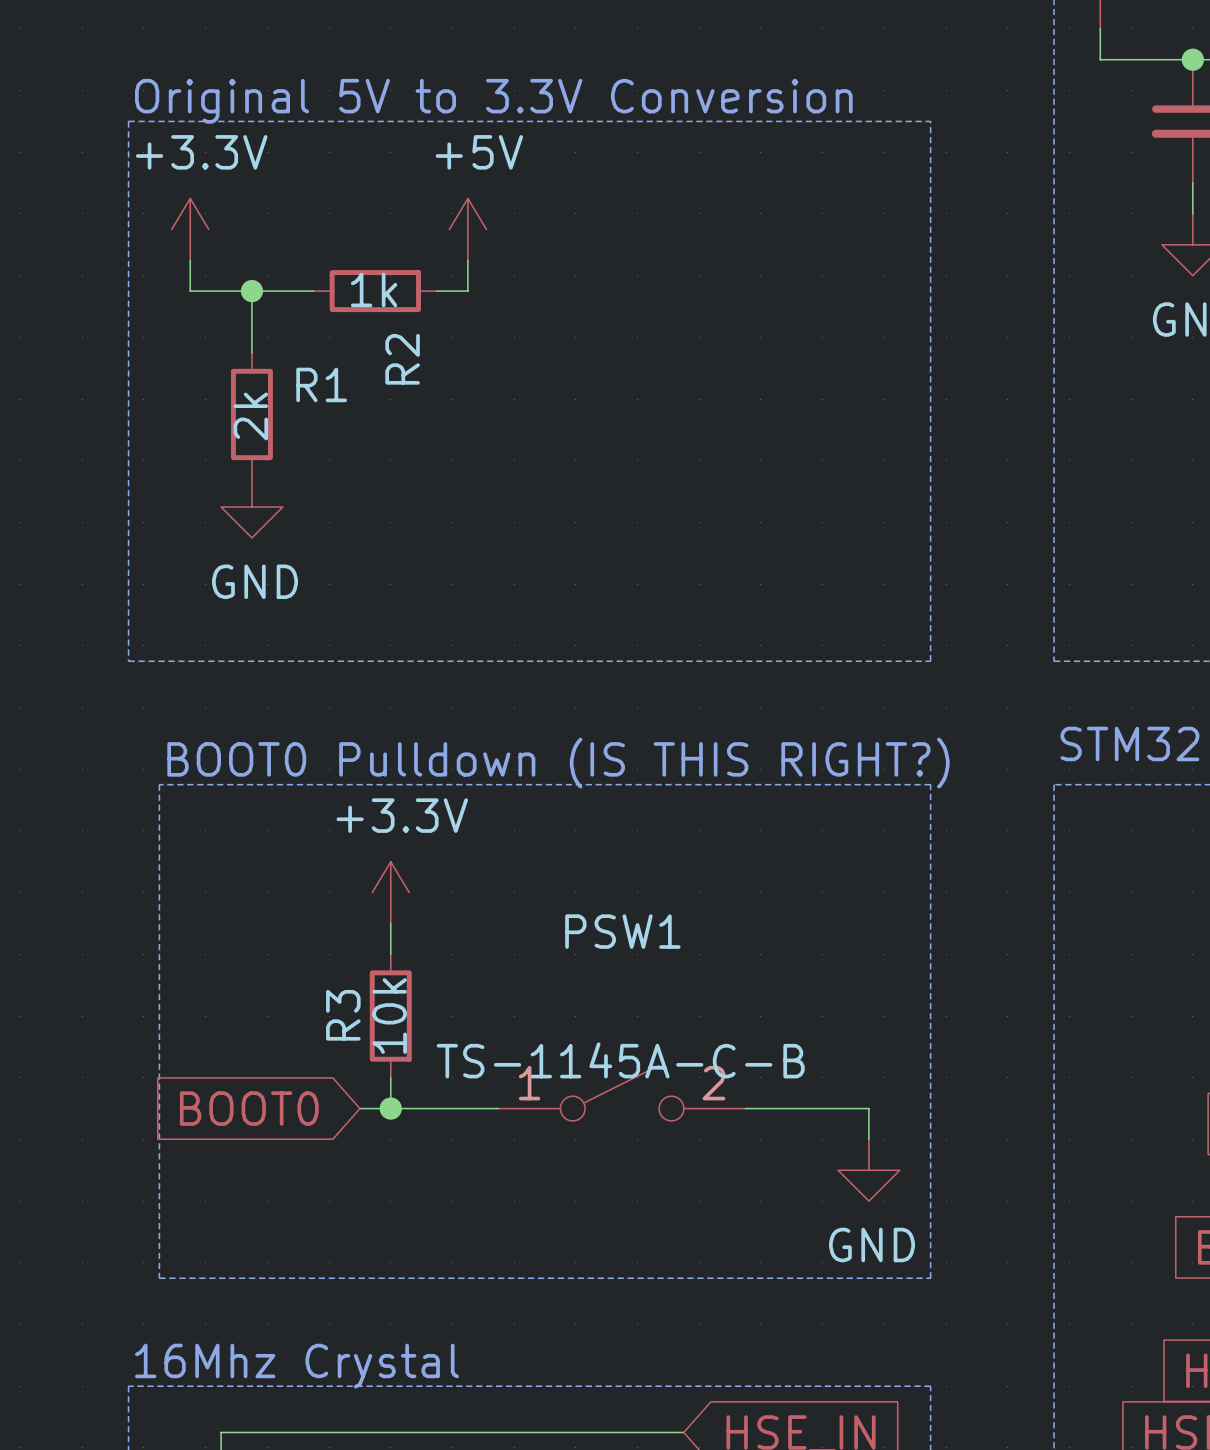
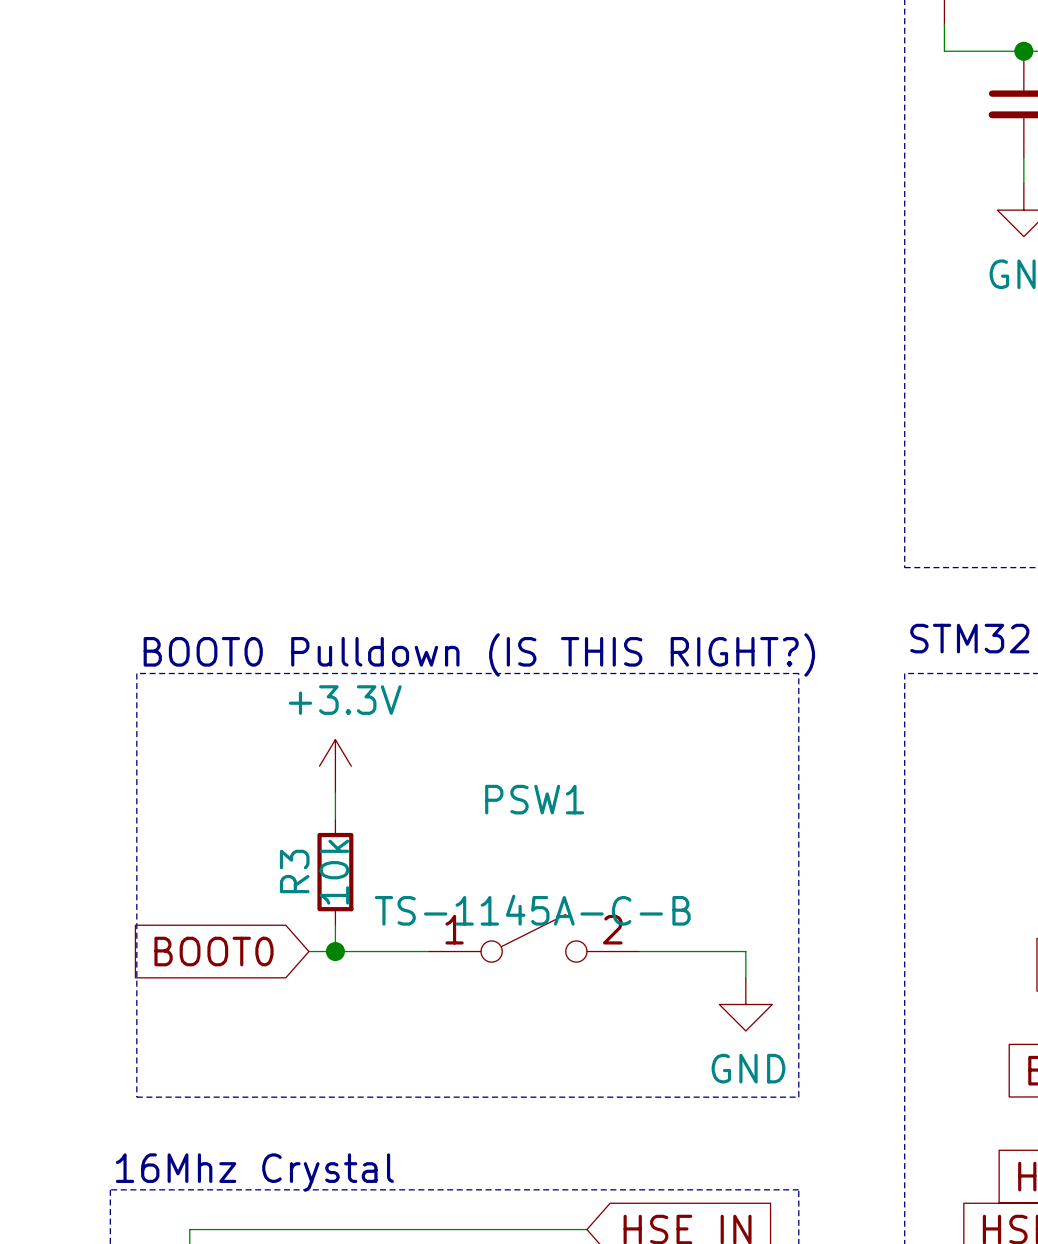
text: Original 5V to 3.3V Conversion (493, 101) -> none
line: (128, 121) (128, 661) (930, 661) (930, 121) (128, 121) -> none
power symbol: +3.3V (190, 229) -> none
power symbol: +5V (467, 229) -> none
wire: (190, 260) (190, 291) (313, 291) -> none
wire: (467, 260) (467, 291) (437, 291) -> none
wire: (251, 291) (251, 352) -> none
junction: (251, 291) -> none
R2: 1k (375, 291) -> none
R1: 2k (251, 414) -> none
power symbol: GND (251, 507) -> none

